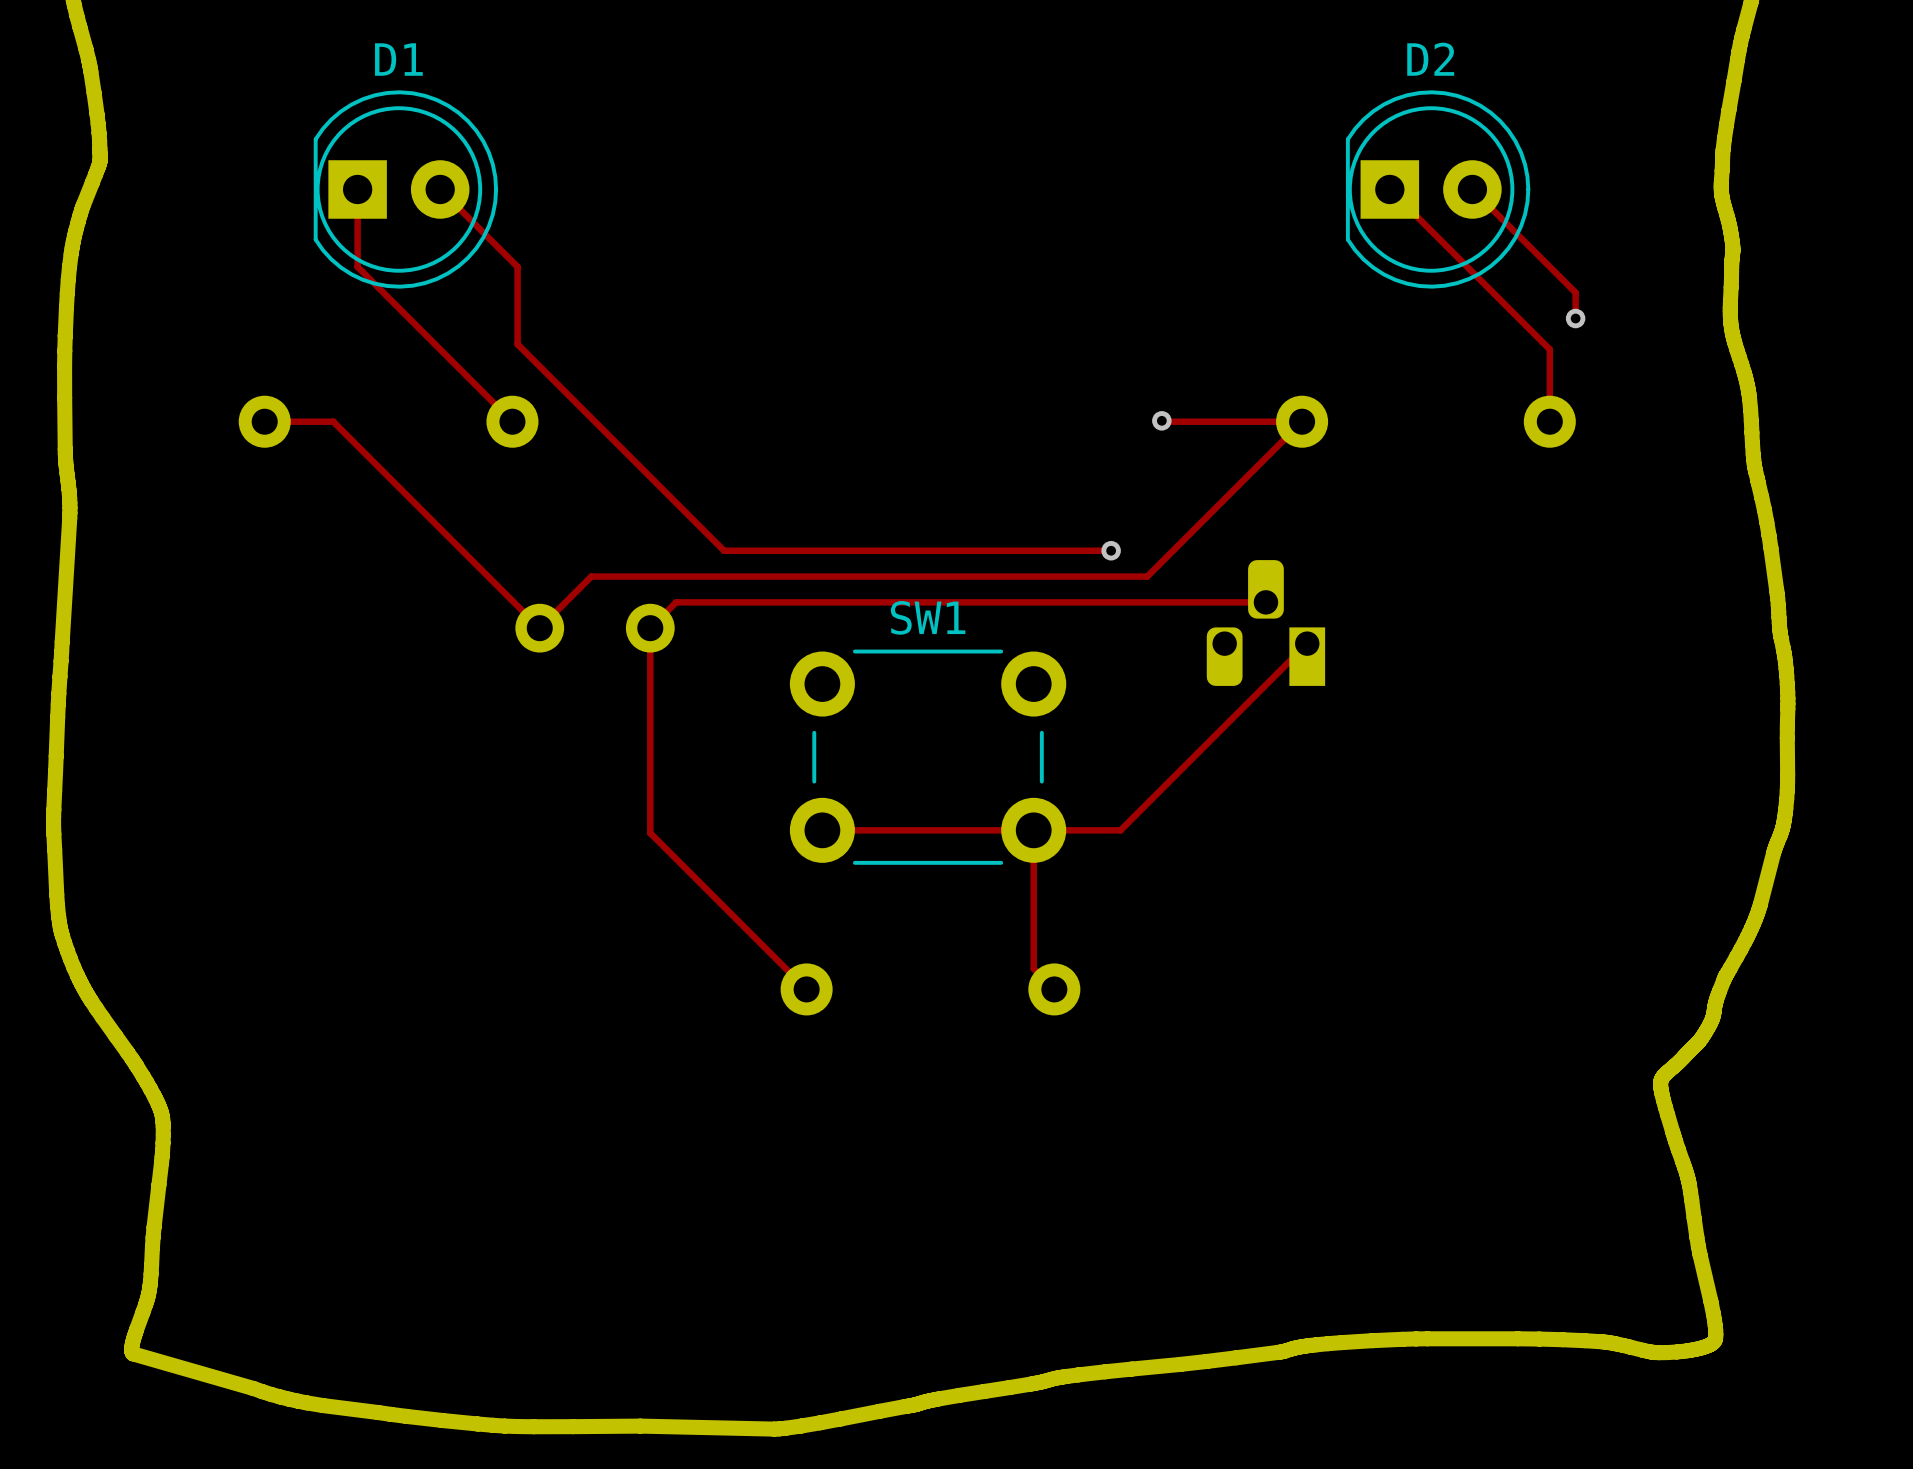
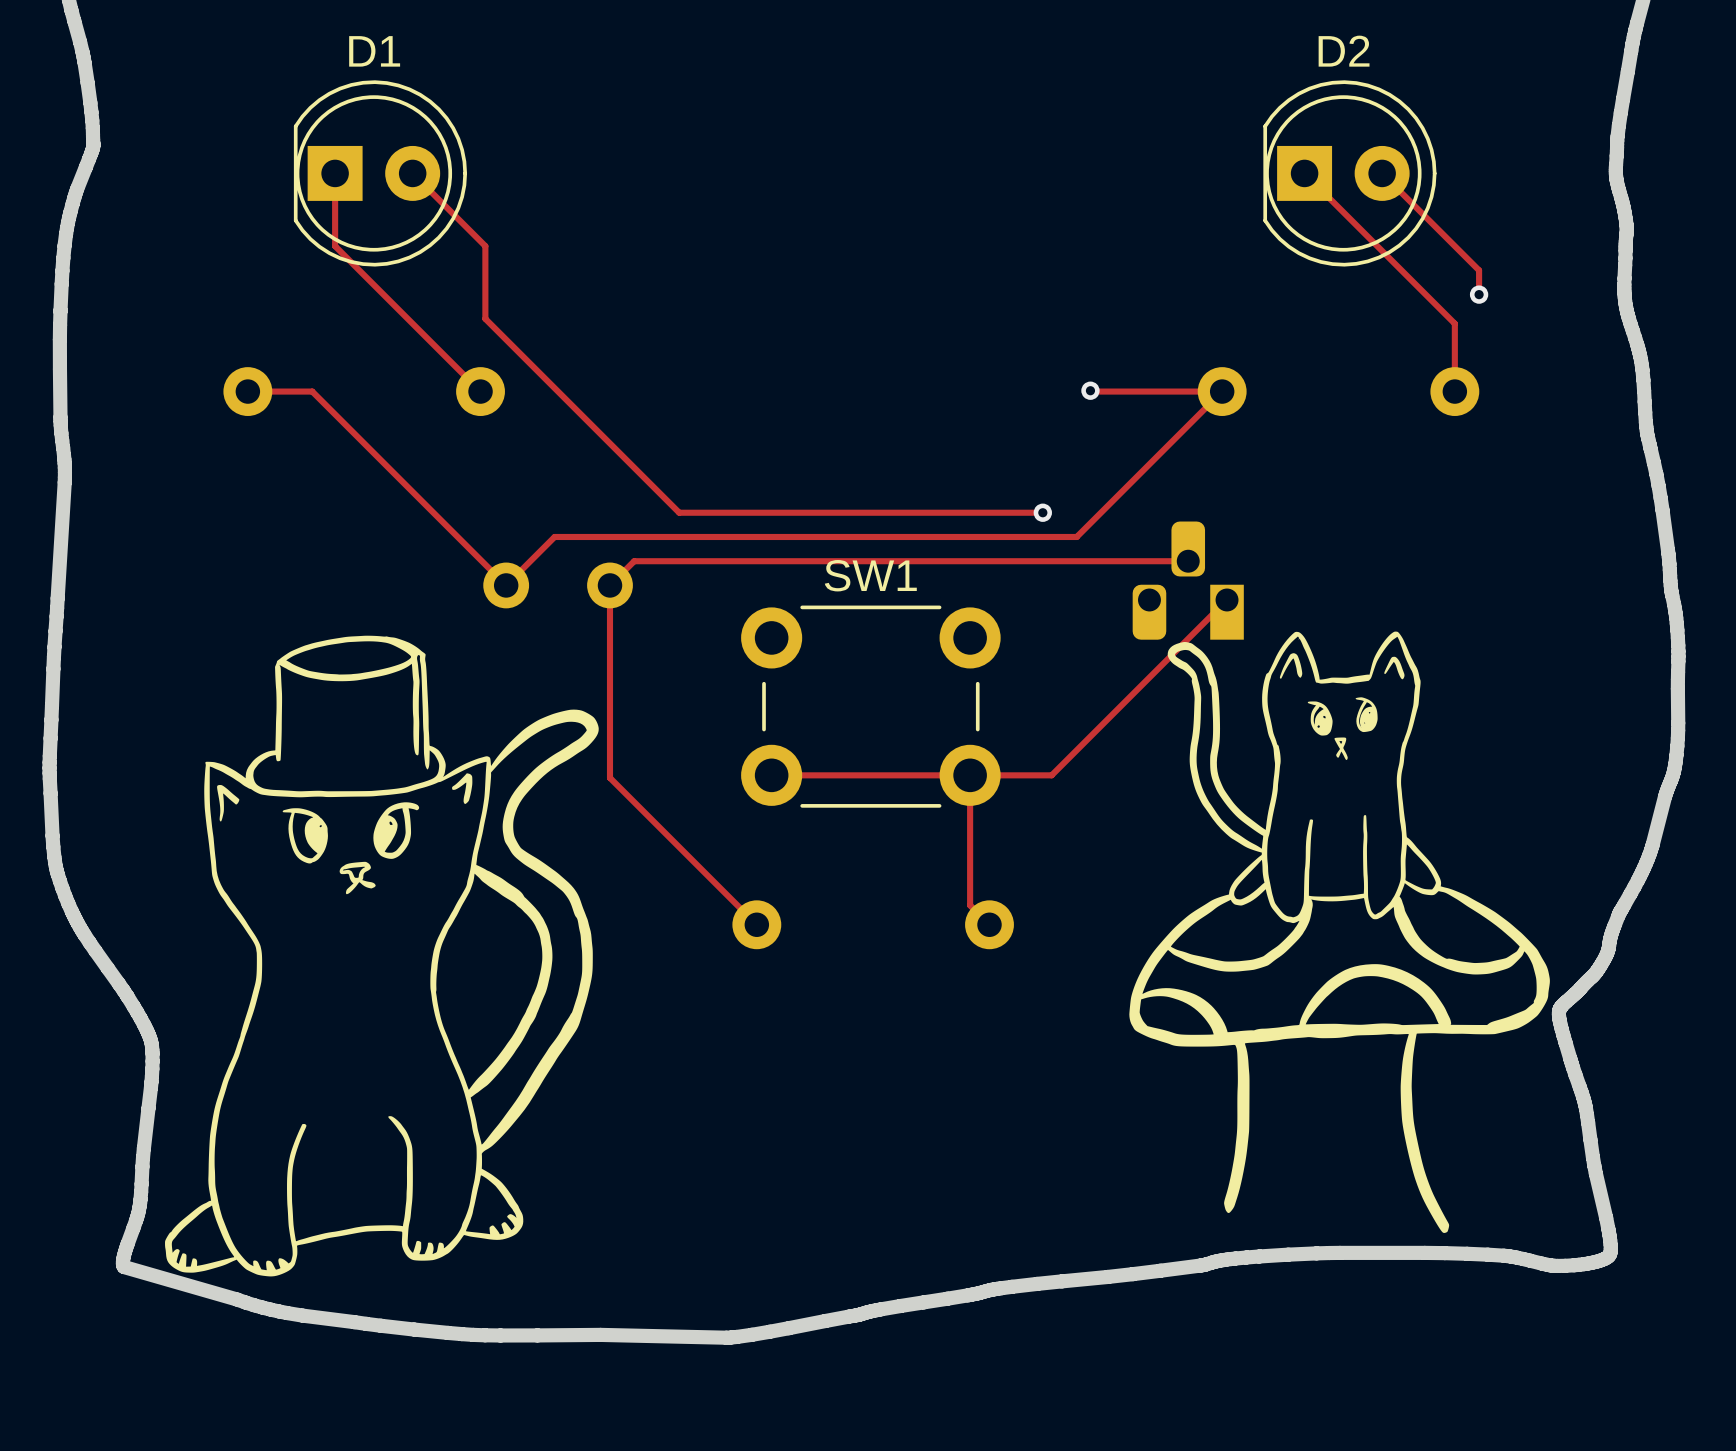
drawing: none -> [1129, 631, 1550, 1233]
drawing: none -> [165, 635, 599, 1277]

